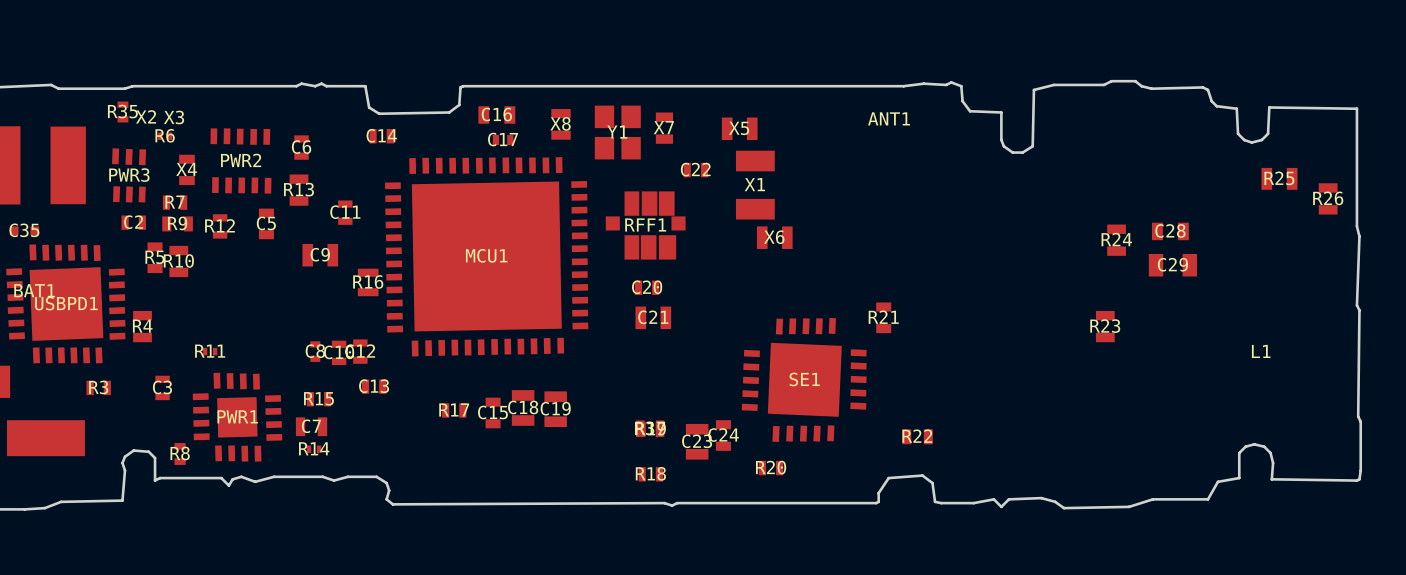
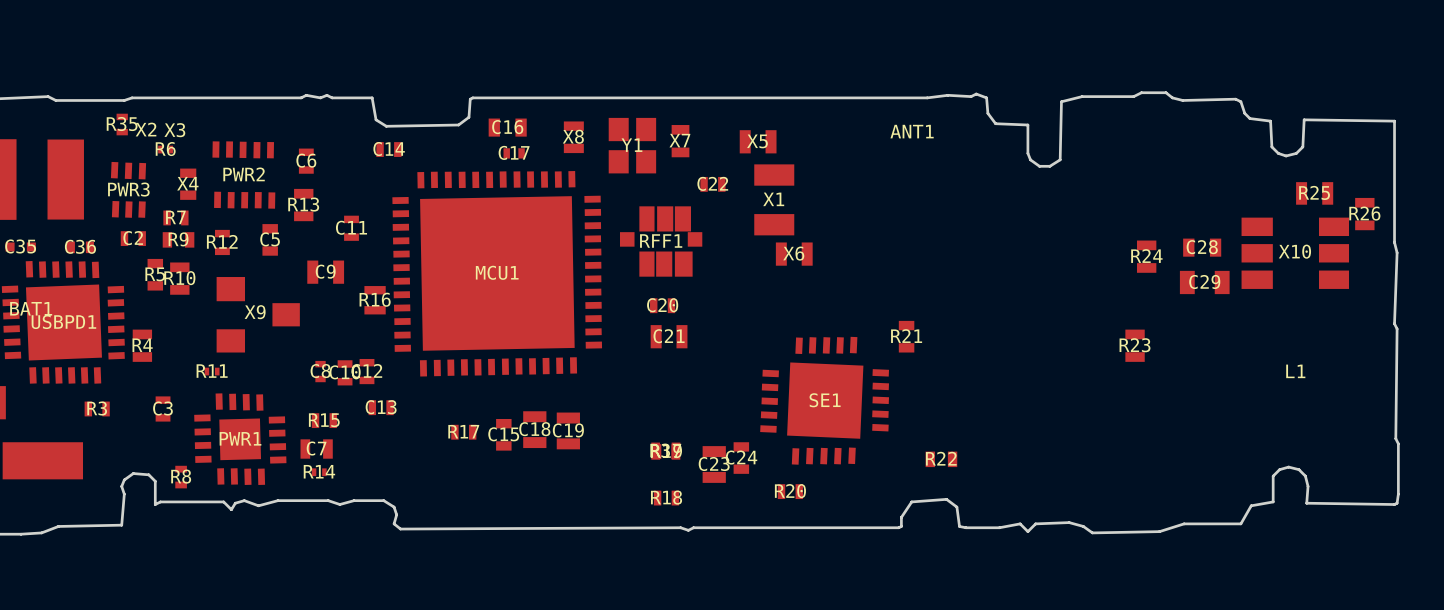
C36: none -> (80, 247)
X10: none -> (1295, 253)
X9: none -> (258, 314)

